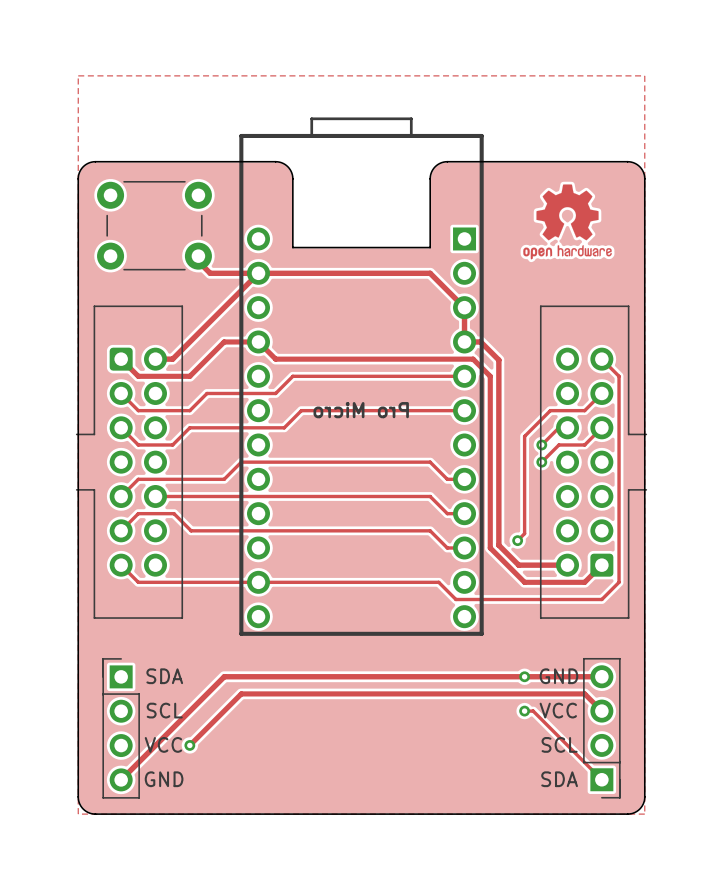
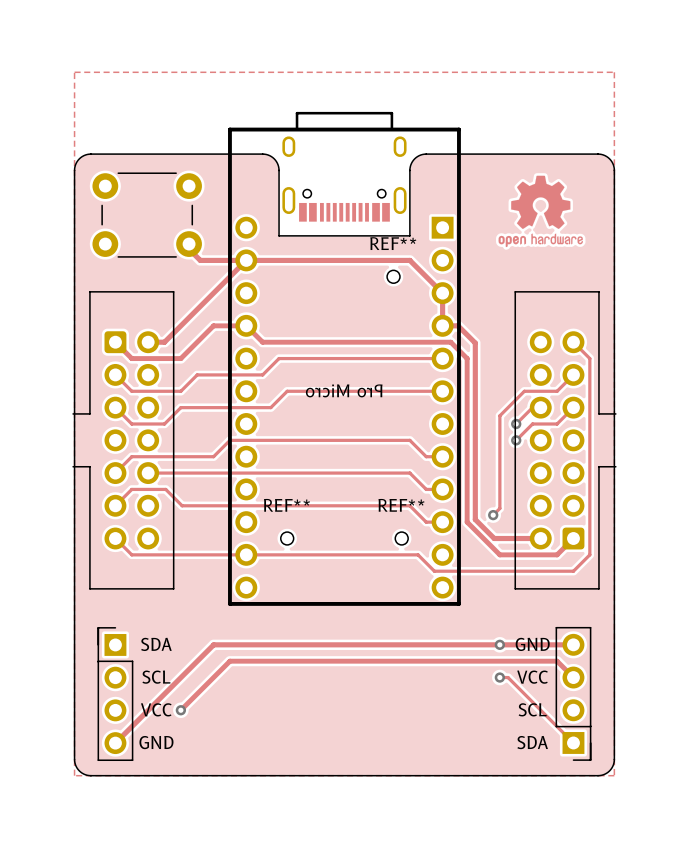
part: none -> (344, 179)
REF**: none -> (393, 276)
REF**: none -> (287, 538)
REF**: none -> (401, 538)

